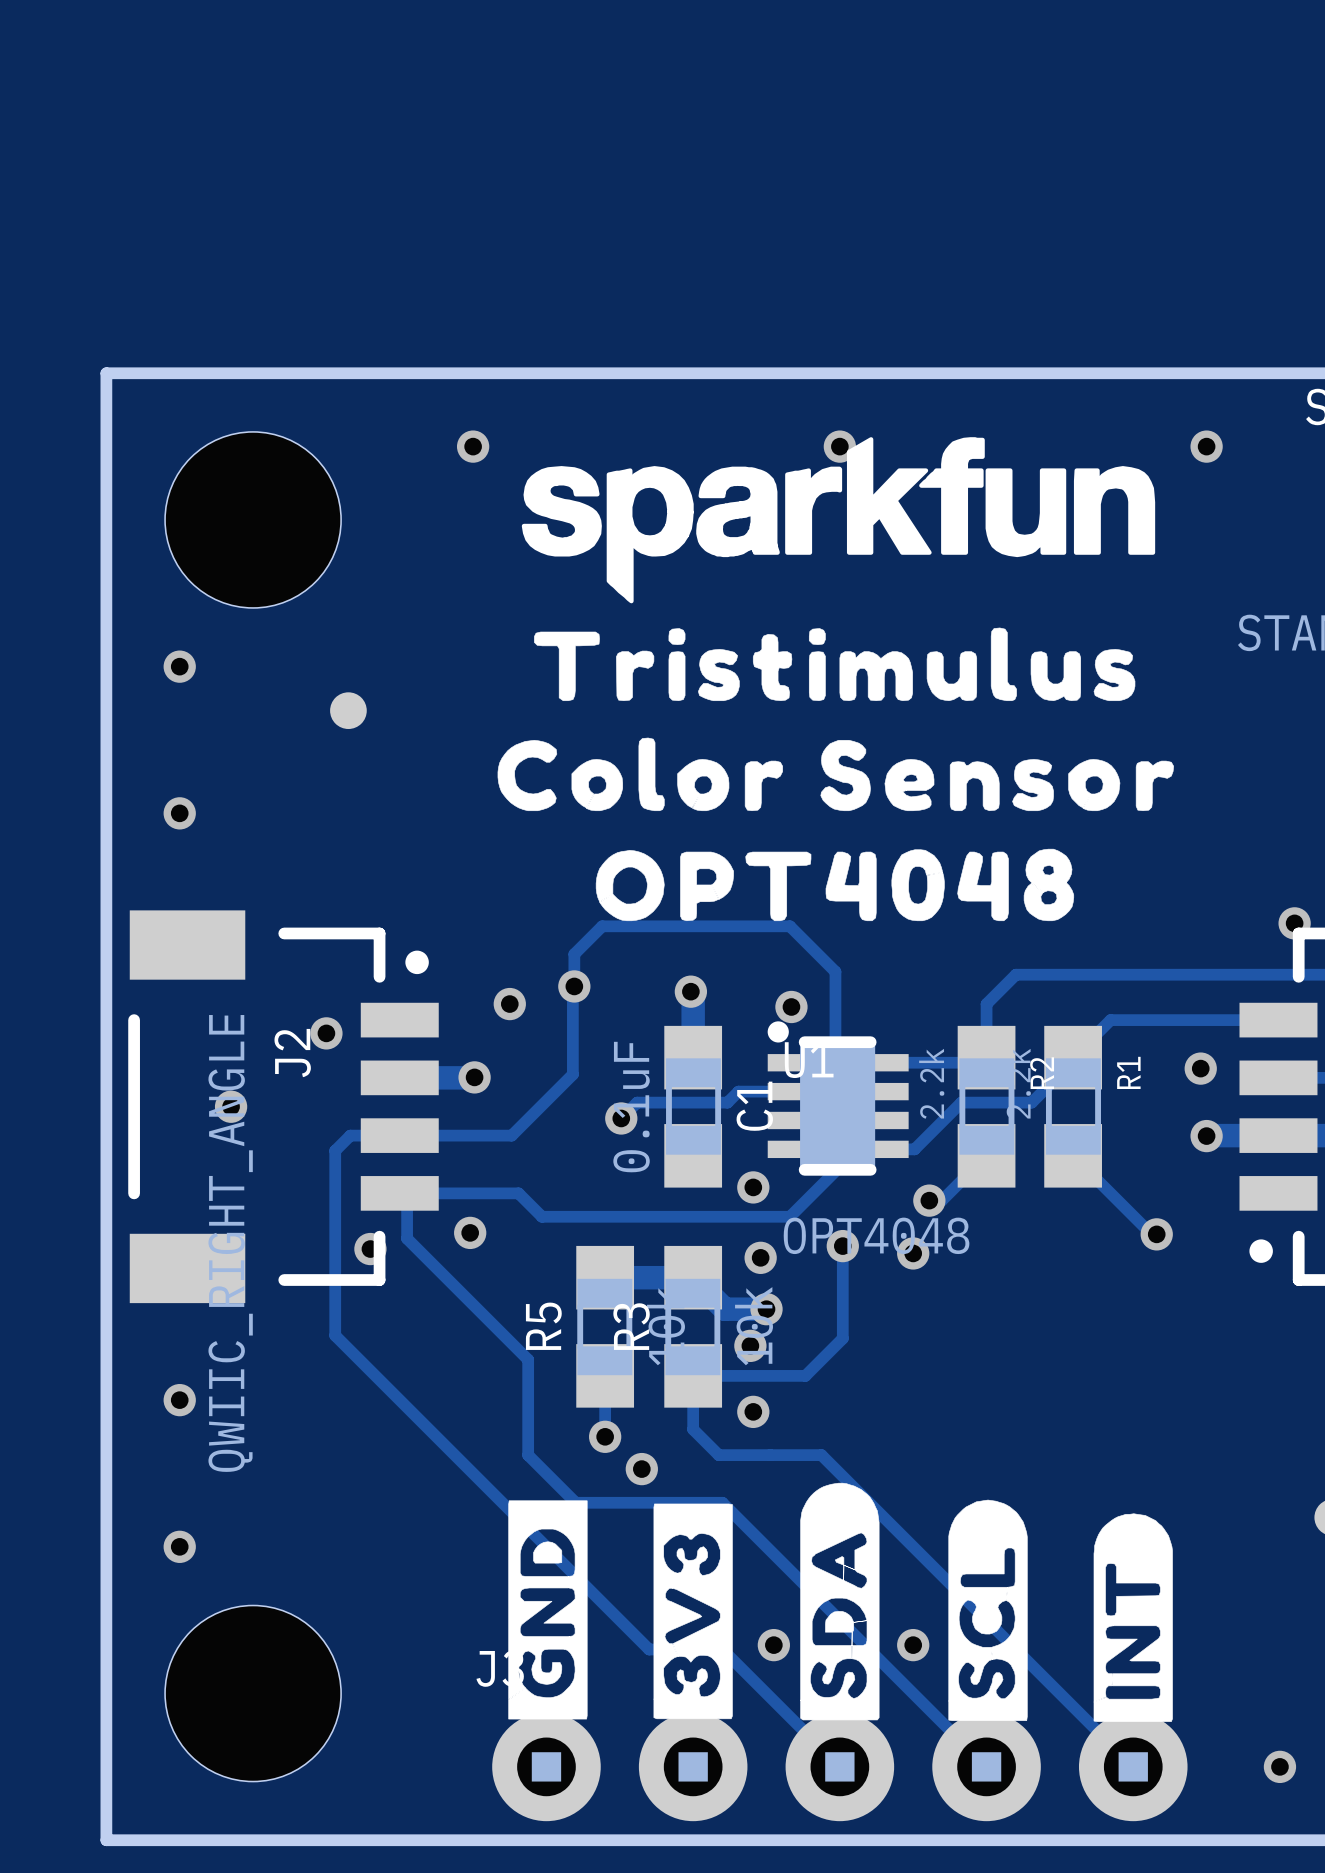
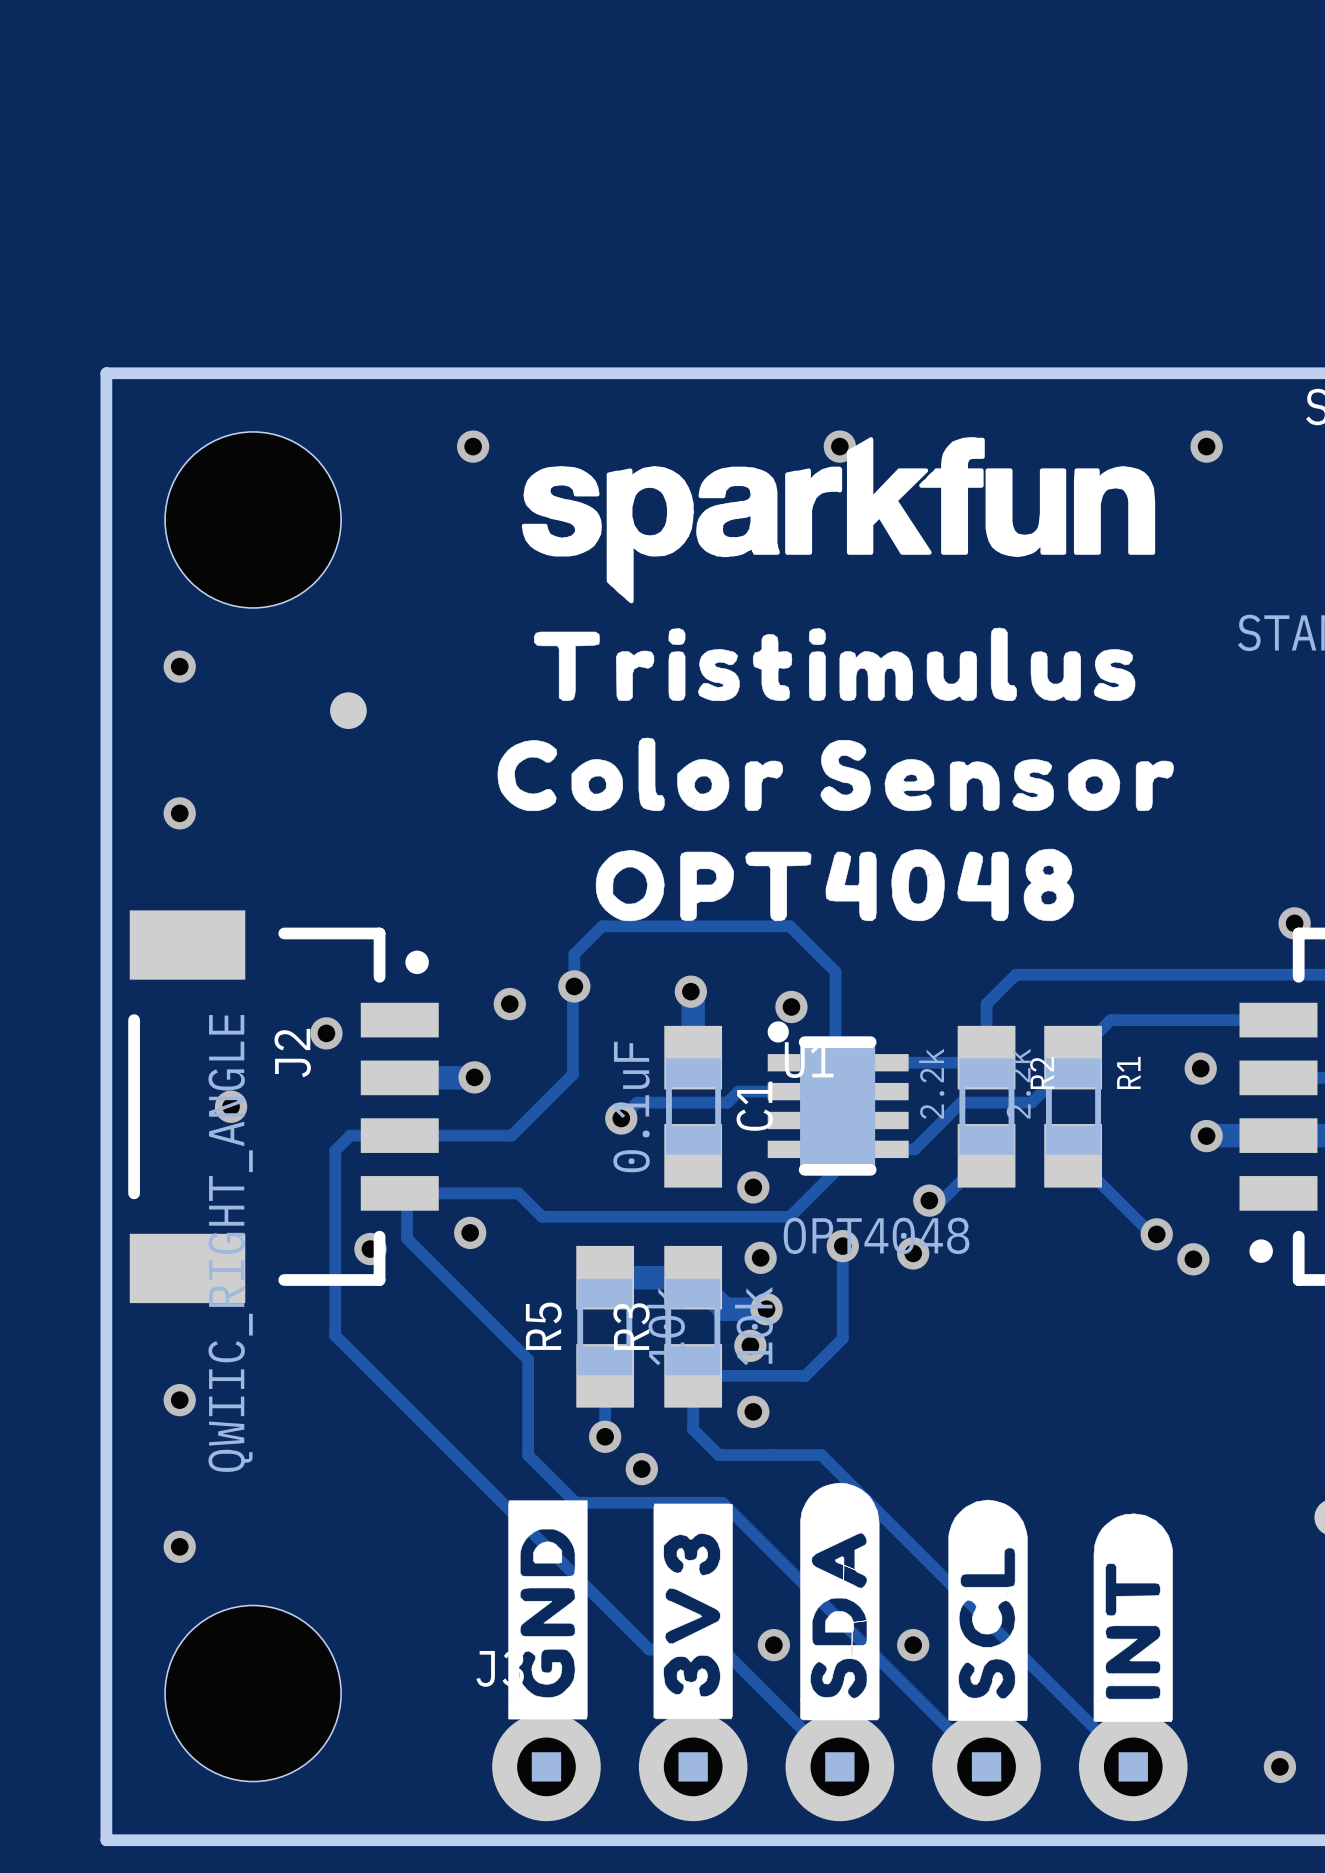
via: none -> (1193, 1259)

